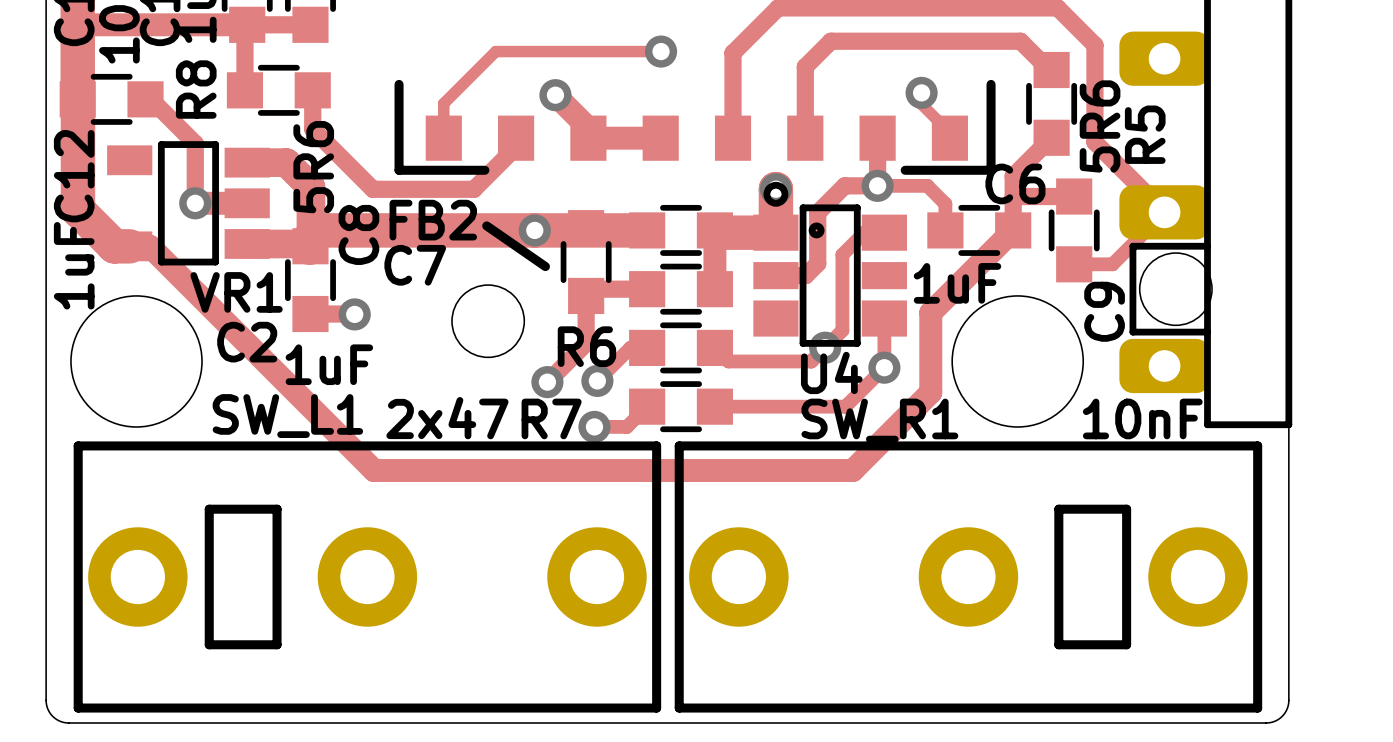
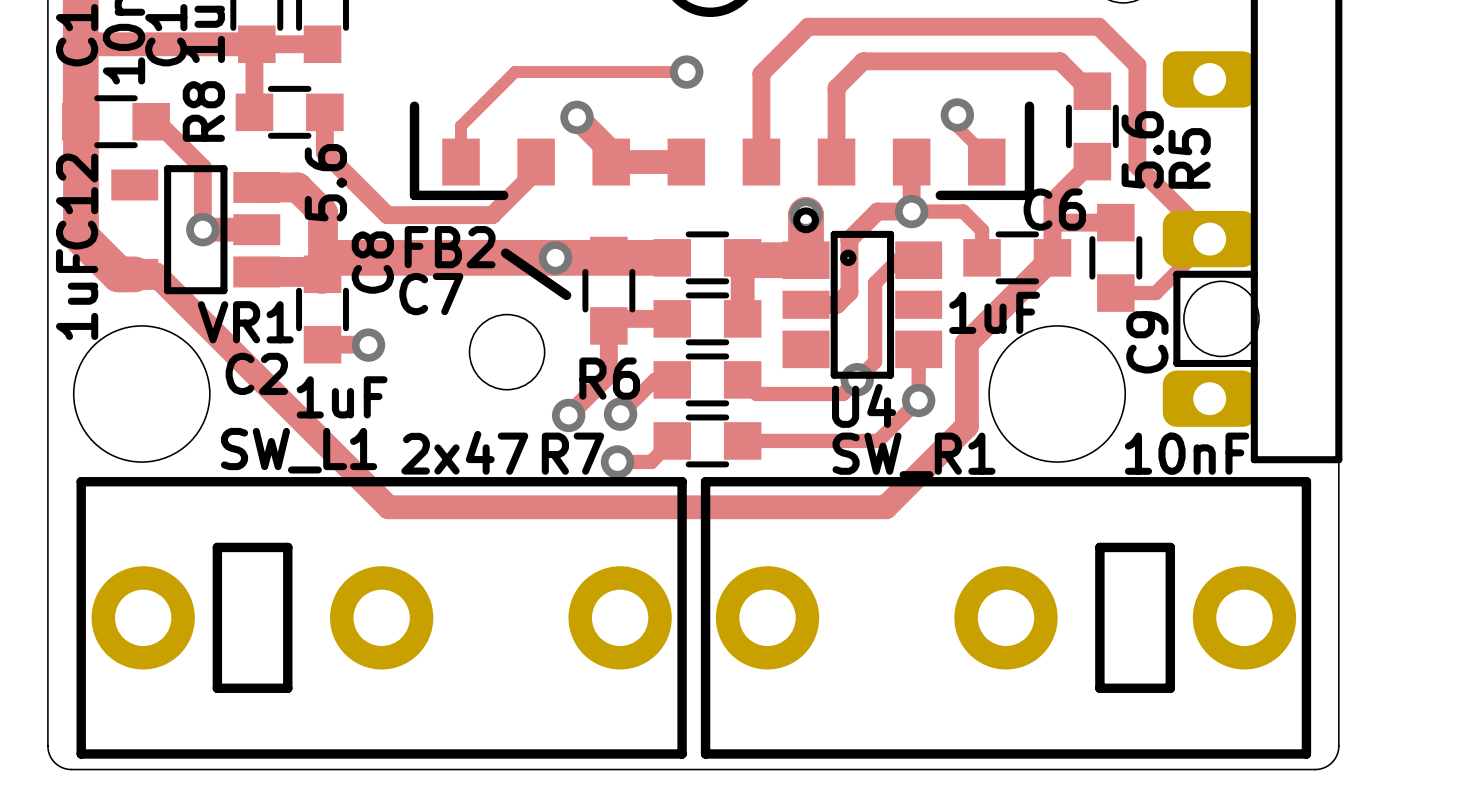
R5 value: 5R6 (1100, 126) -> 5.6 (1142, 149)
R8 value: 5R6 (313, 167) -> 5.6 (325, 182)

